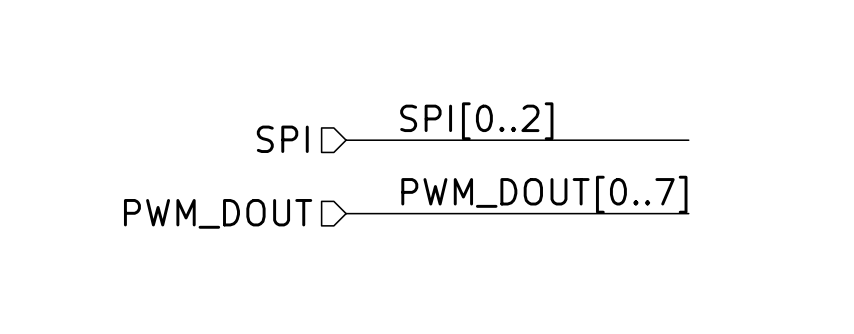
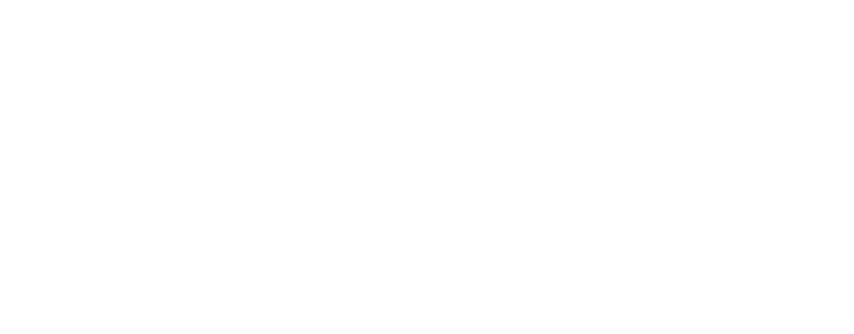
label: SPI[0..2] (476, 121) -> none
hierarchical label: SPI (282, 139) -> none
bus: (346, 140) (688, 140) -> none
label: PWM_DOUT[0..7] (544, 194) -> none
hierarchical label: PWM_DOUT (218, 213) -> none
bus: (346, 213) (688, 213) -> none

